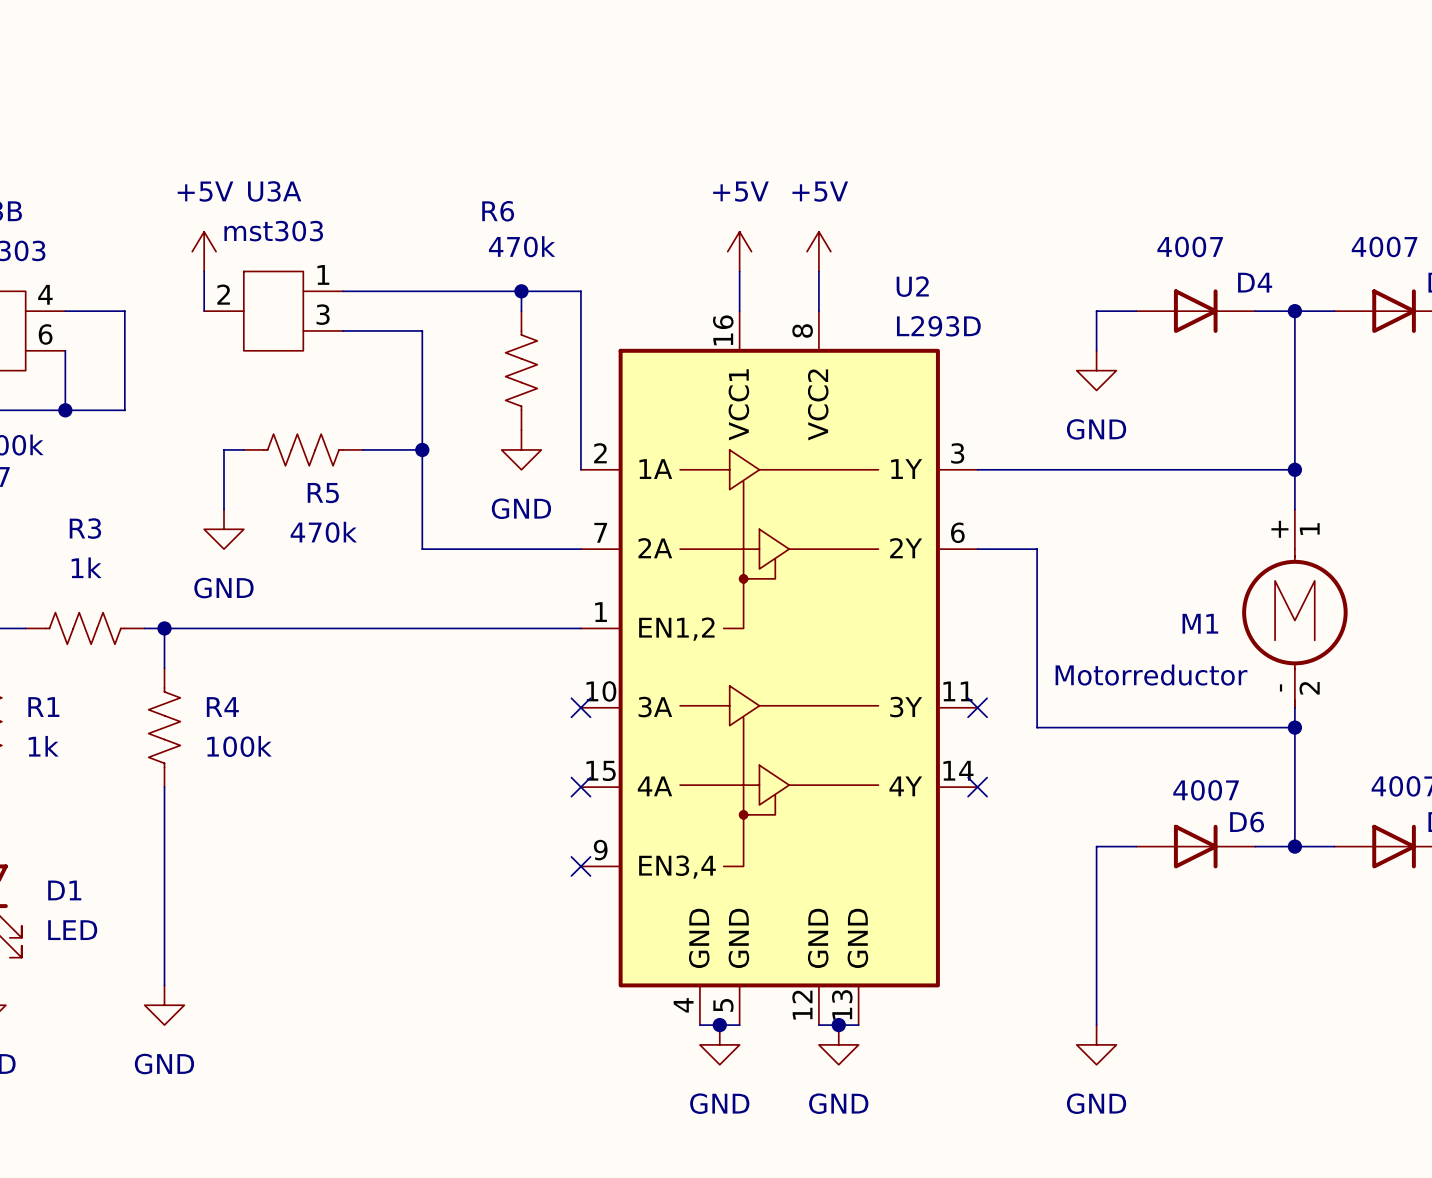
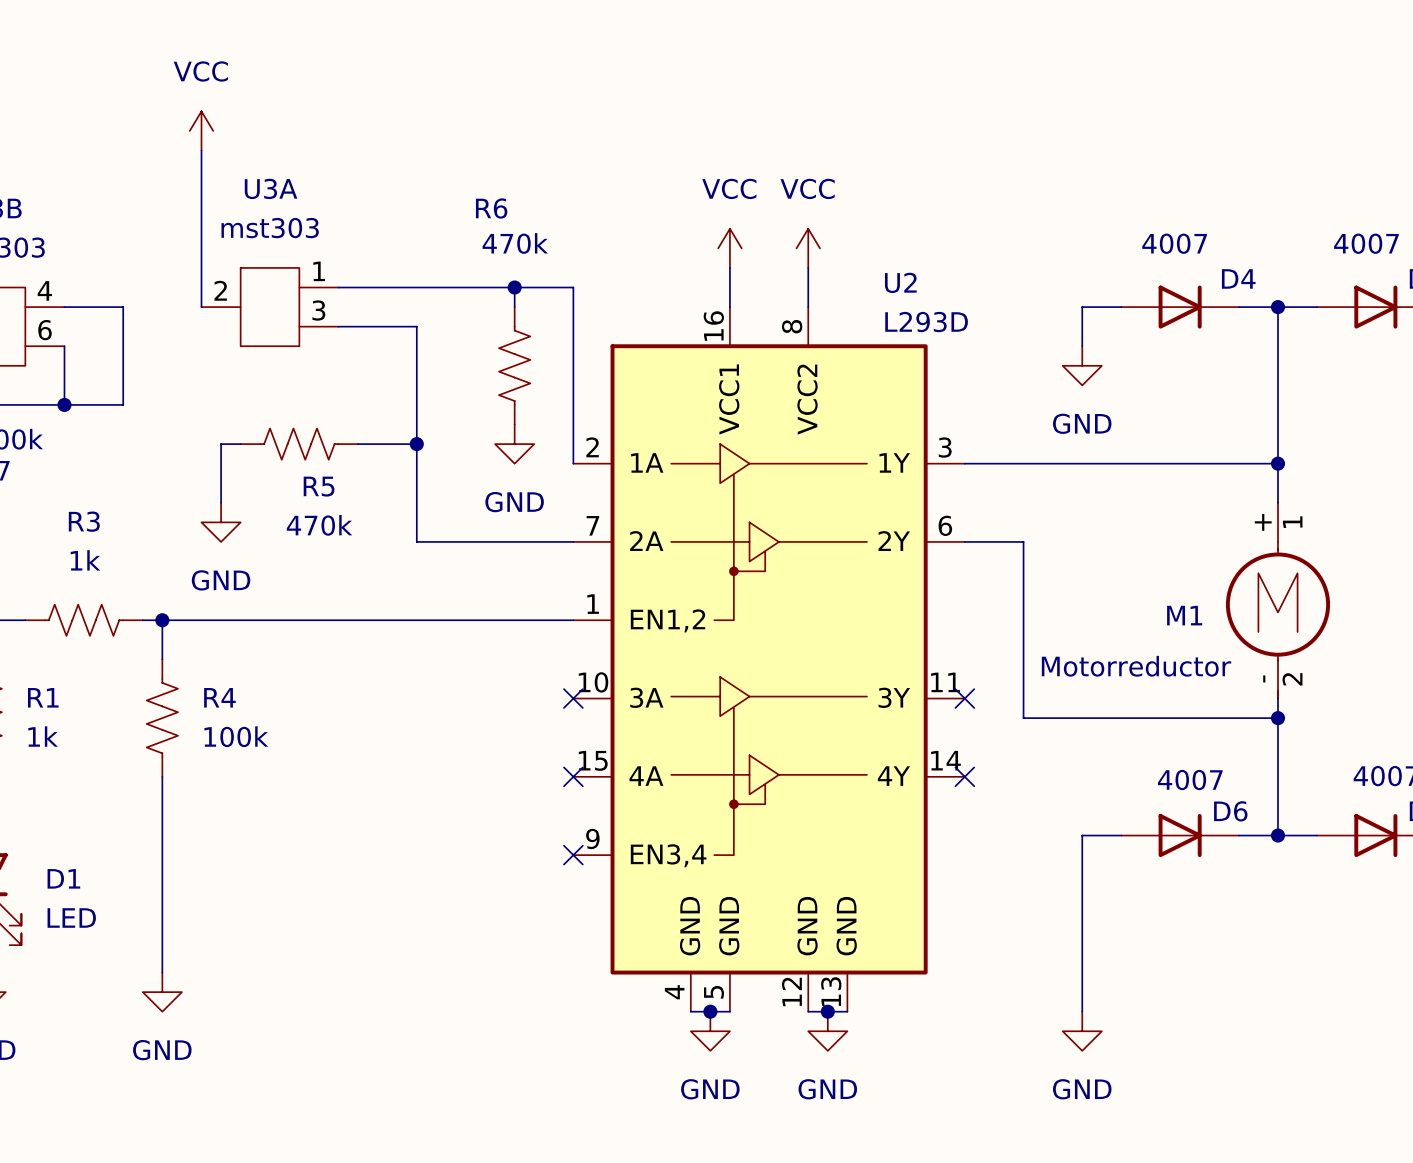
power symbol: none -> VCC (201, 130)
wire: none -> (201, 150) (201, 267)
power symbol: +5V (204, 251) -> none
power symbol: +5V (739, 251) -> VCC (729, 248)
power symbol: +5V (818, 251) -> VCC (808, 248)

